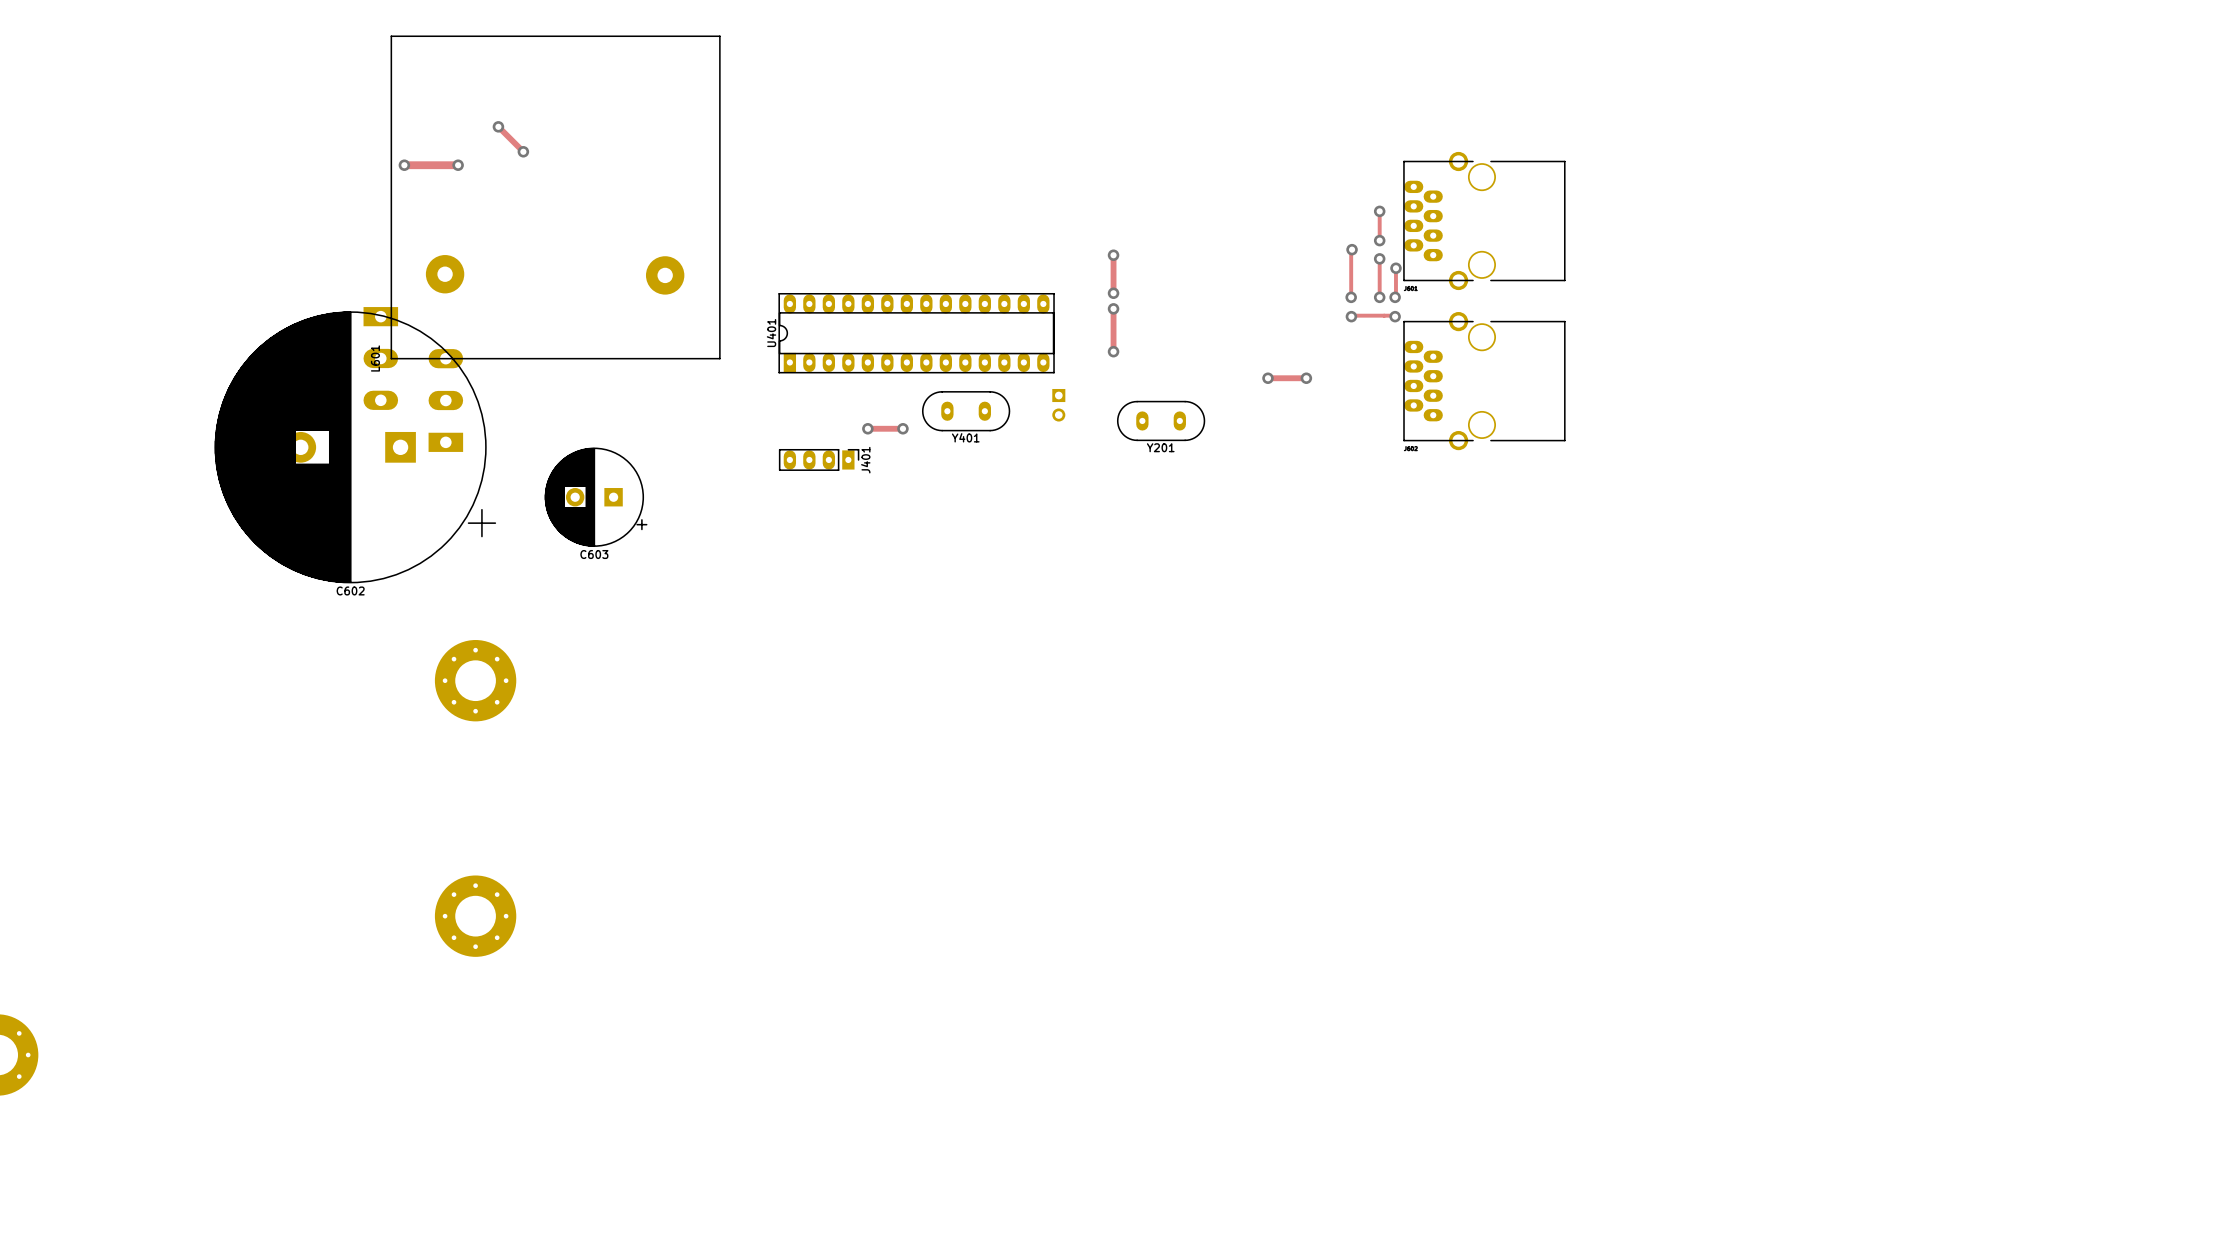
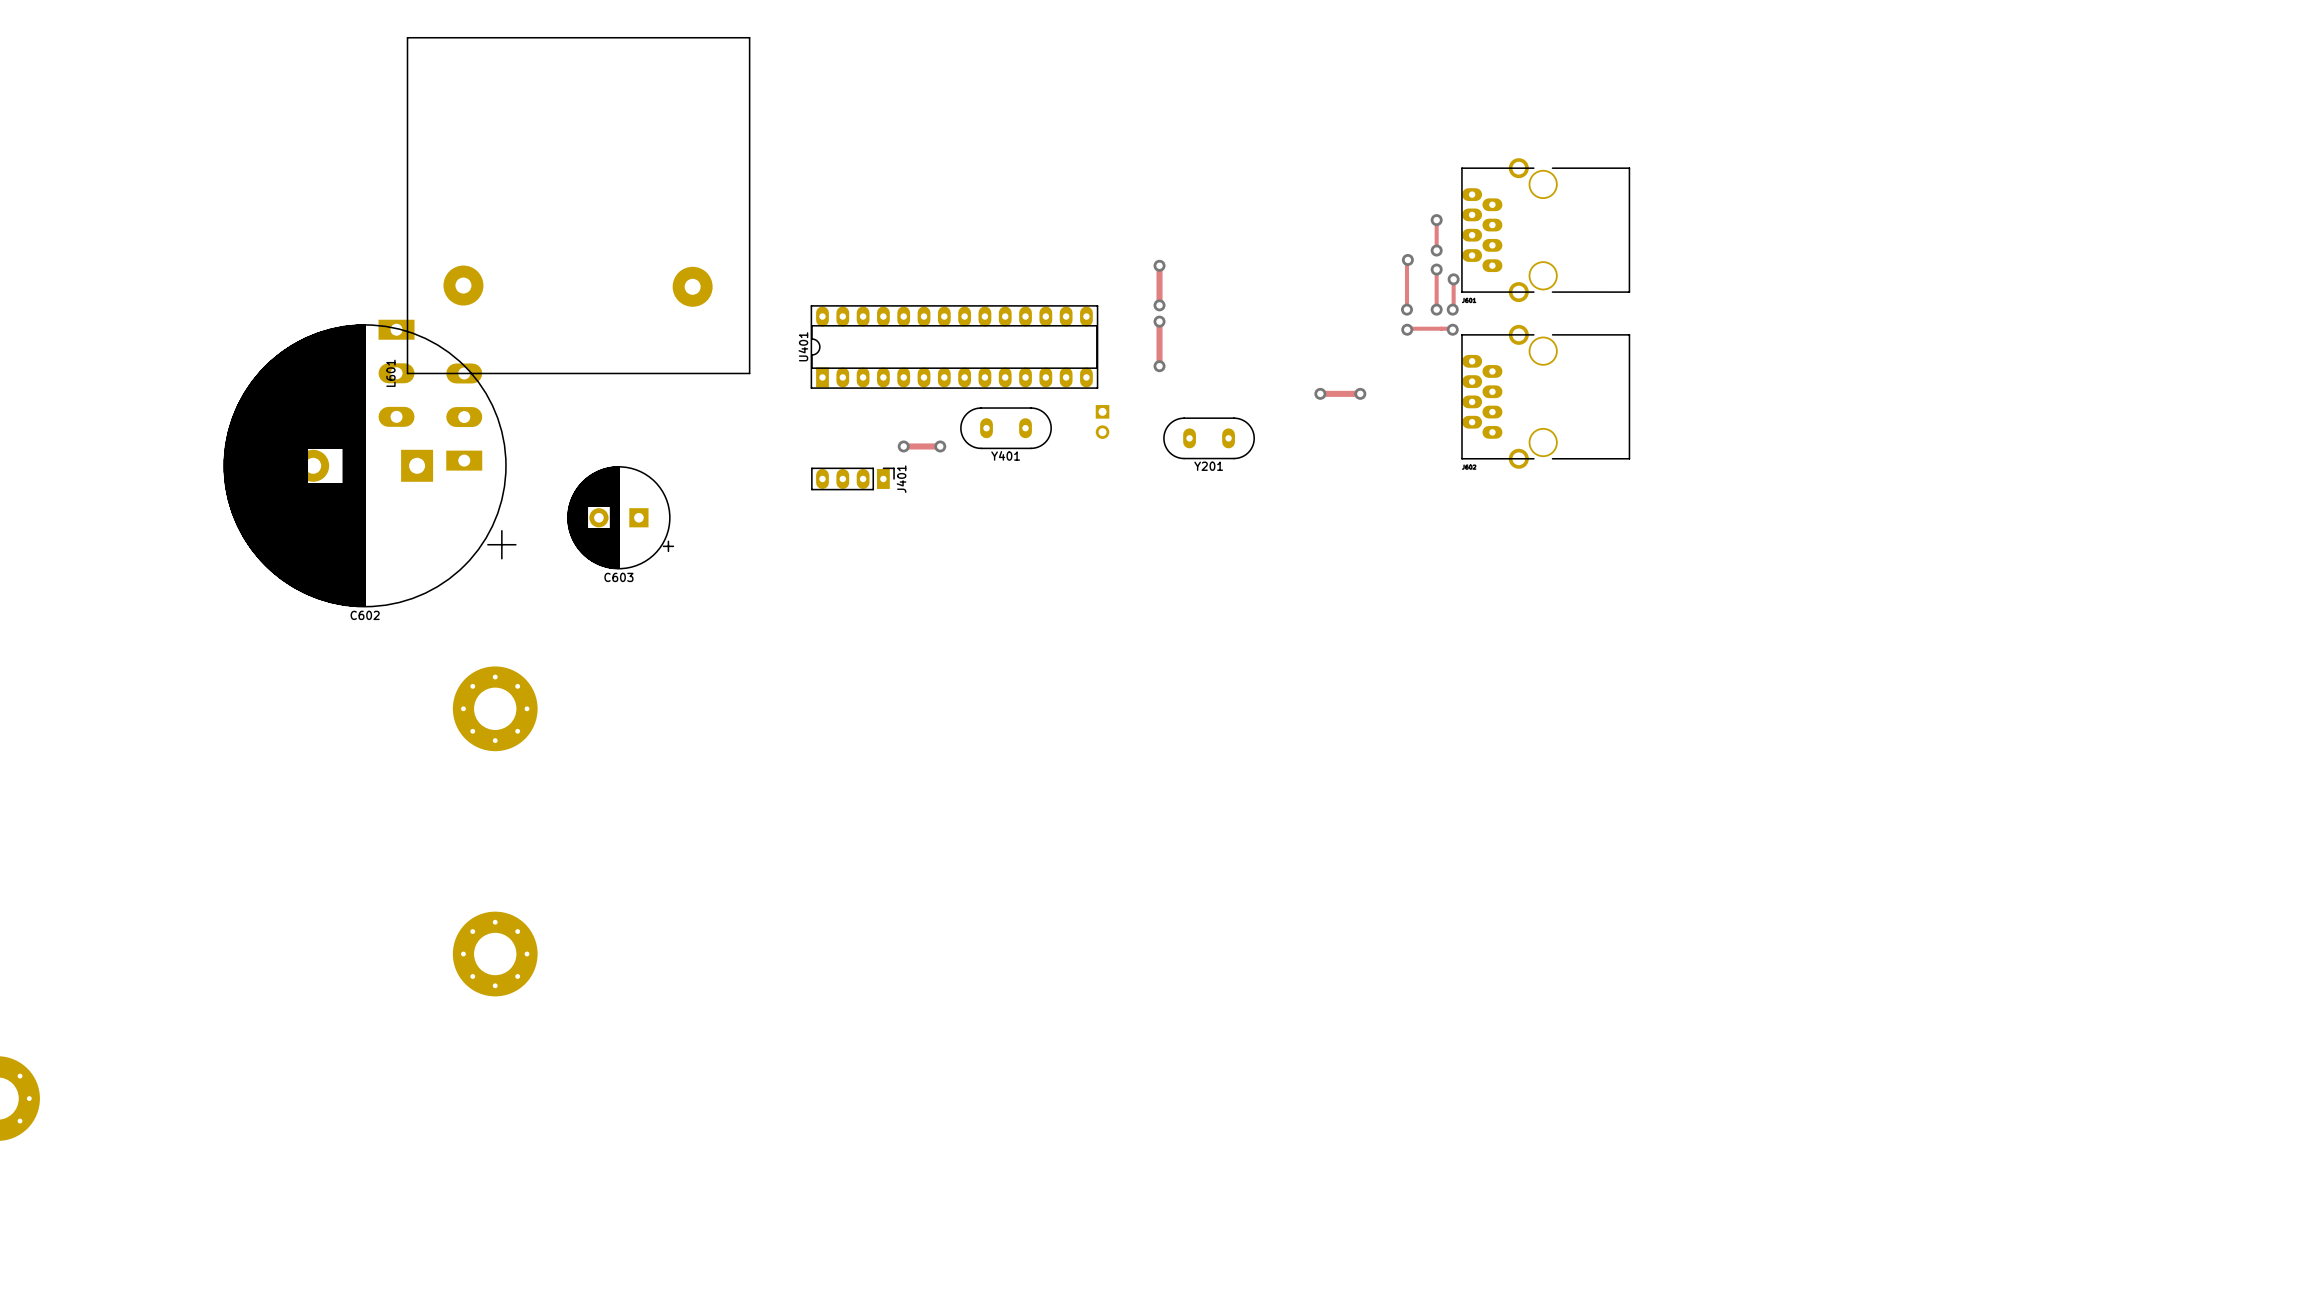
track: (498, 126) (523, 151) -> none
via: (498, 126) -> none
via: (523, 151) -> none
track: (404, 165) (458, 165) -> none
via: (404, 165) -> none
via: (458, 165) -> none

